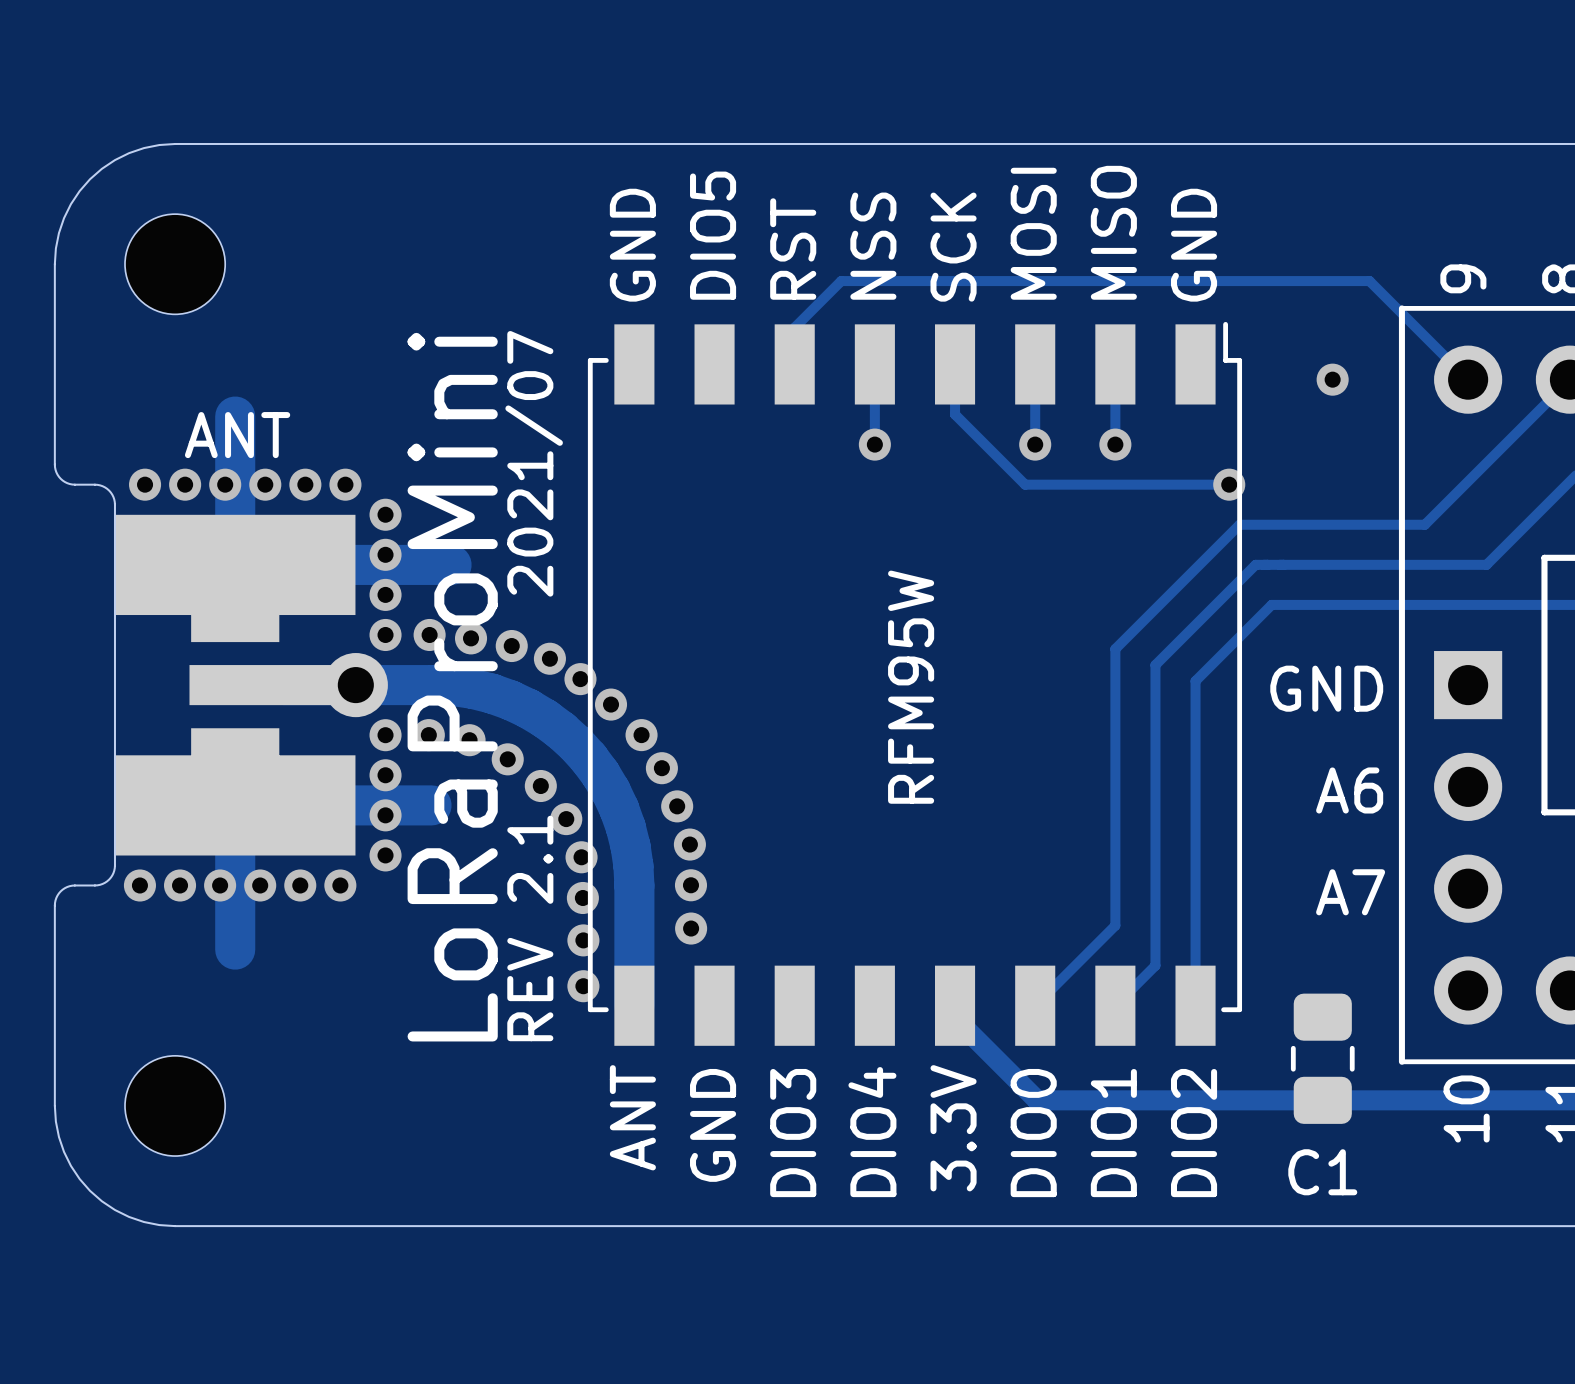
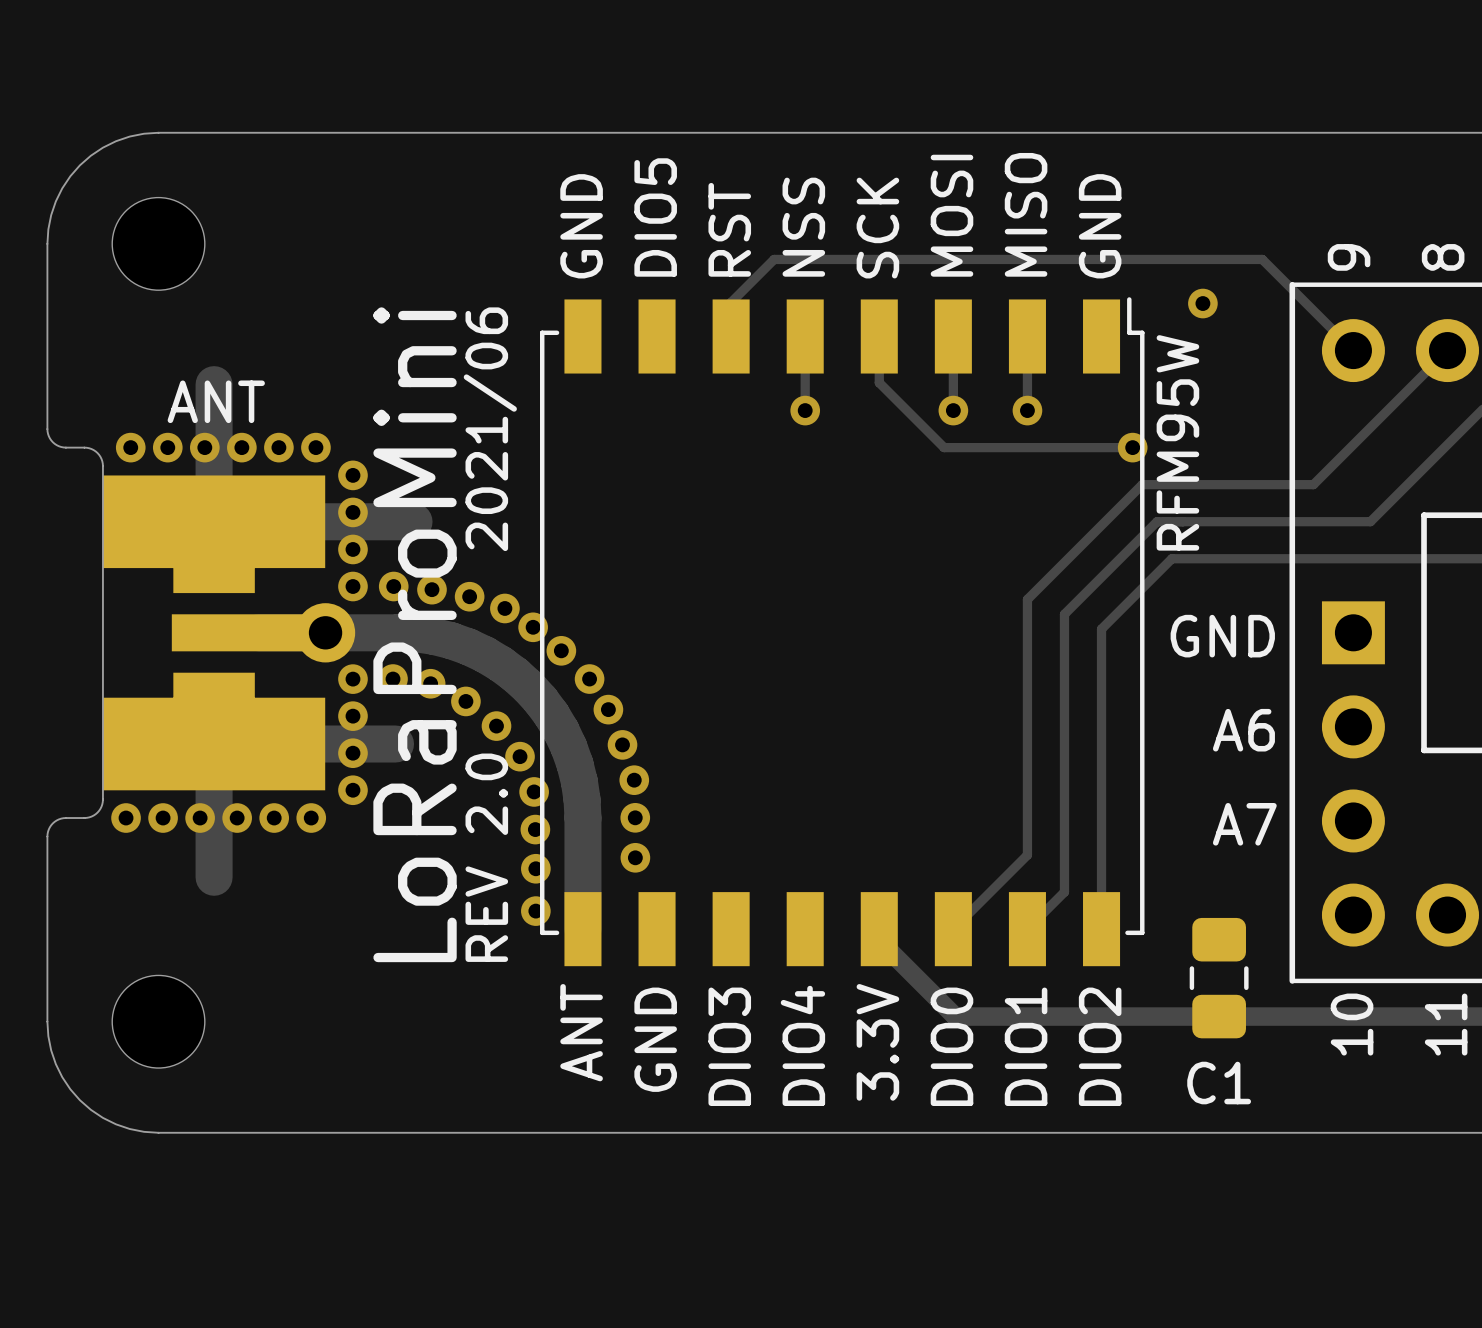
via position: (1332, 379) -> (1202, 303)
text: 2021/07 (534, 463) -> 2021/06 (490, 429)
text position: RFM95W (911, 687) -> RFM95W (1177, 442)
text: REV 2.1 (530, 928) -> REV 2.0 (486, 857)

